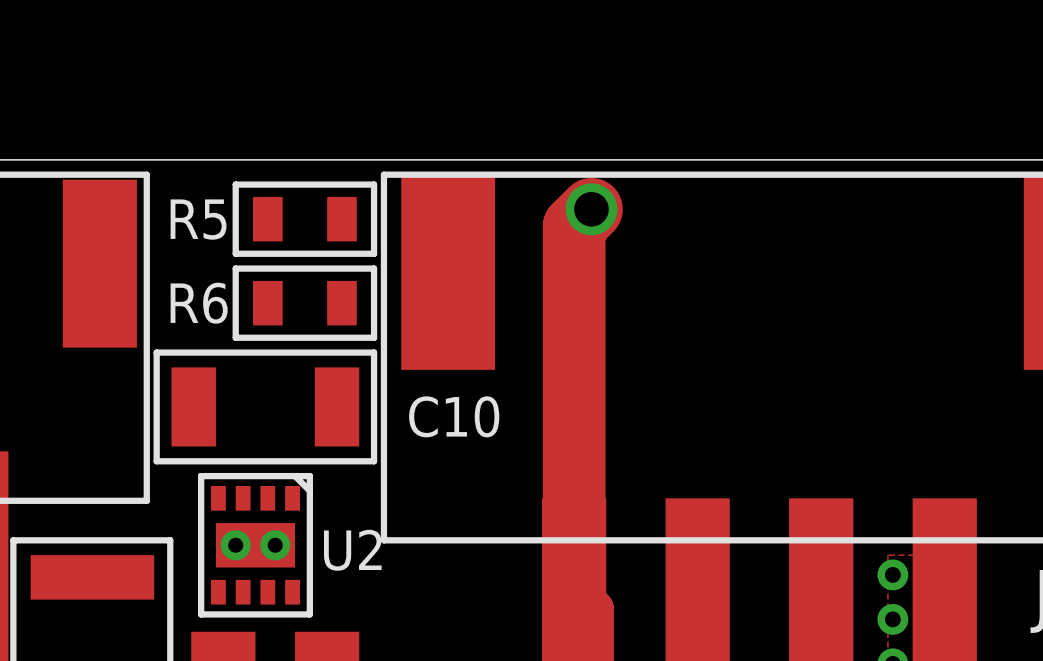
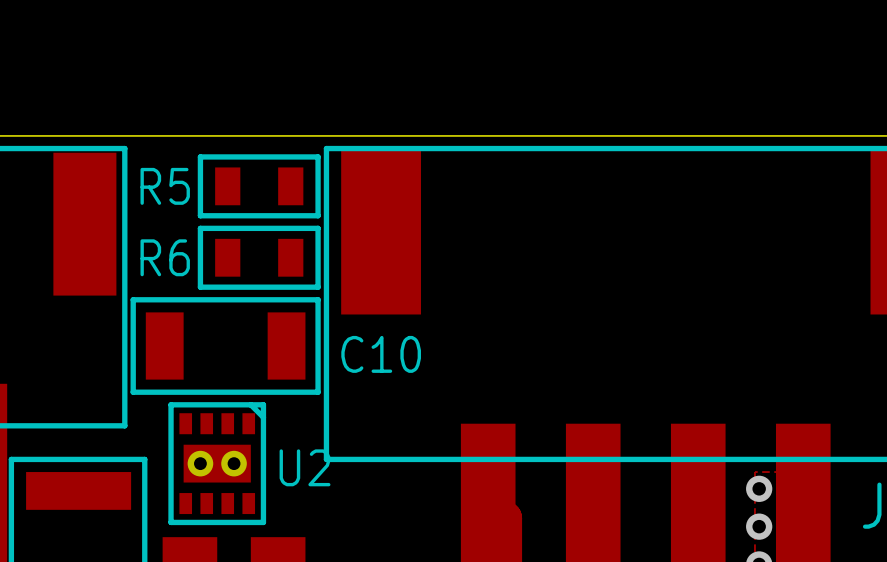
track: (591, 209) (574, 226) (574, 609) -> none
via: (591, 209) -> none

